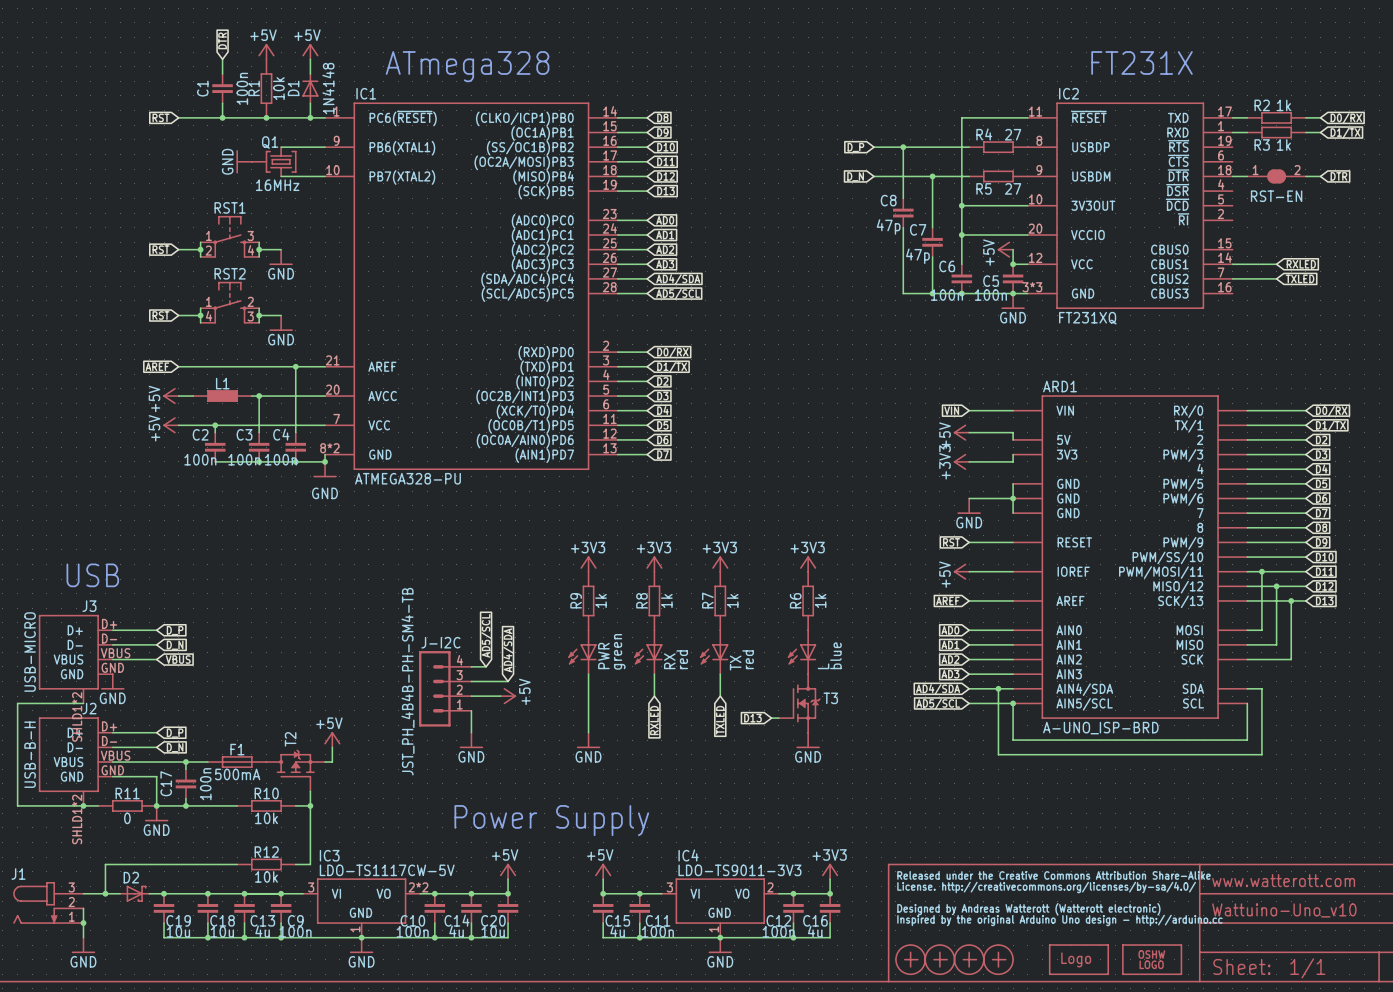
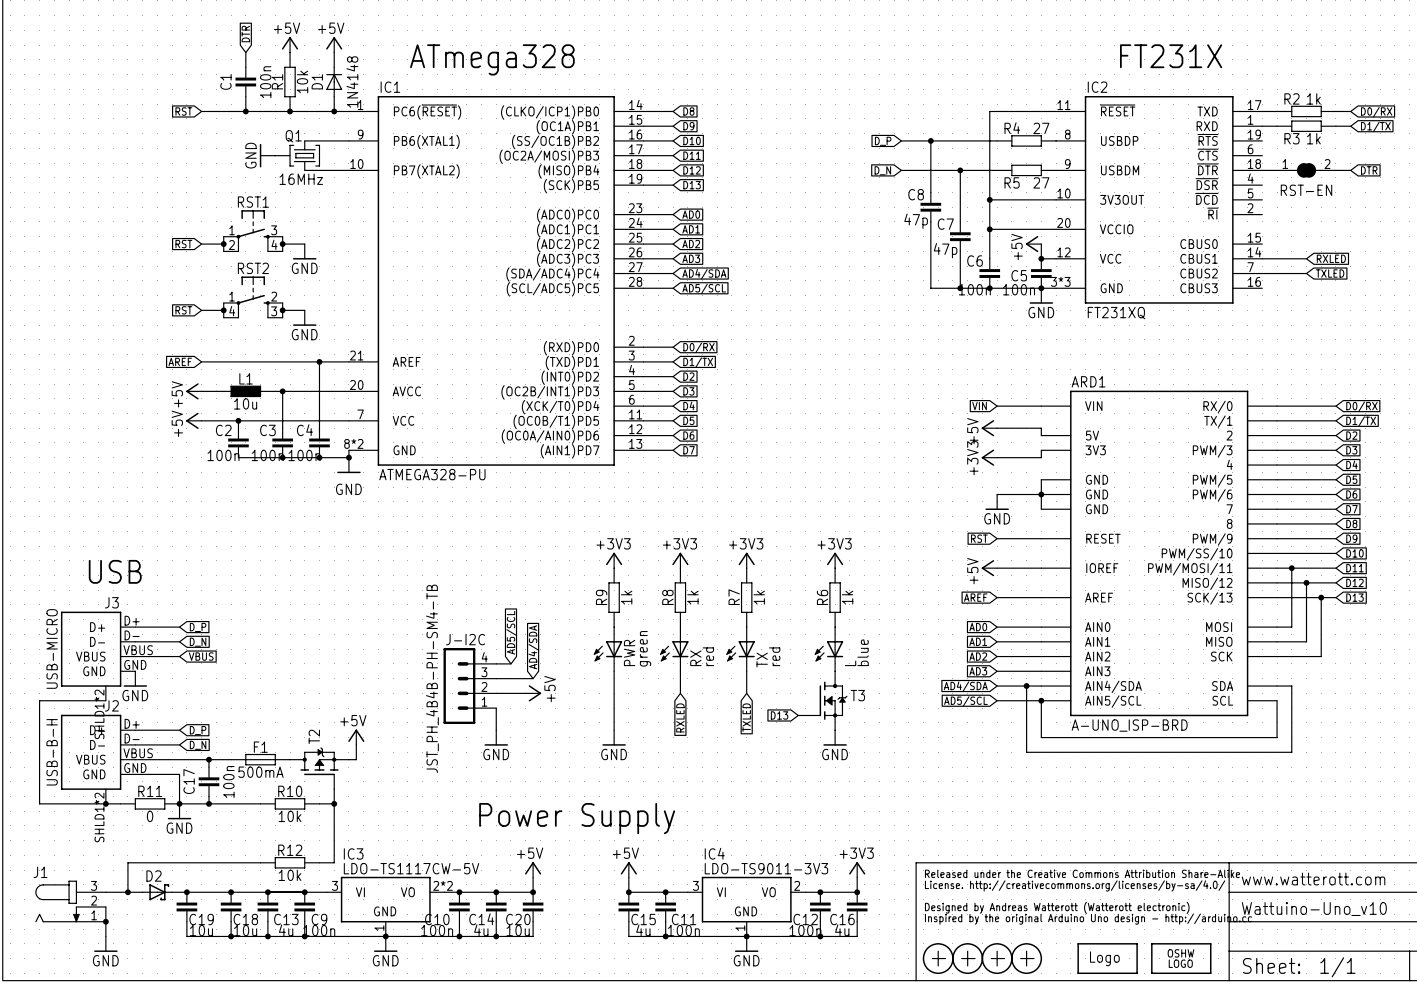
L1 value: none -> 10u (245, 403)

